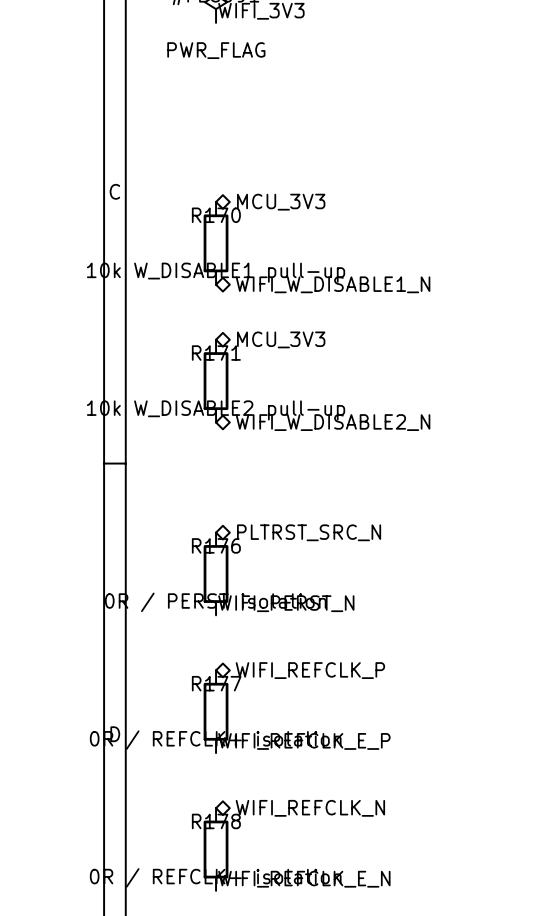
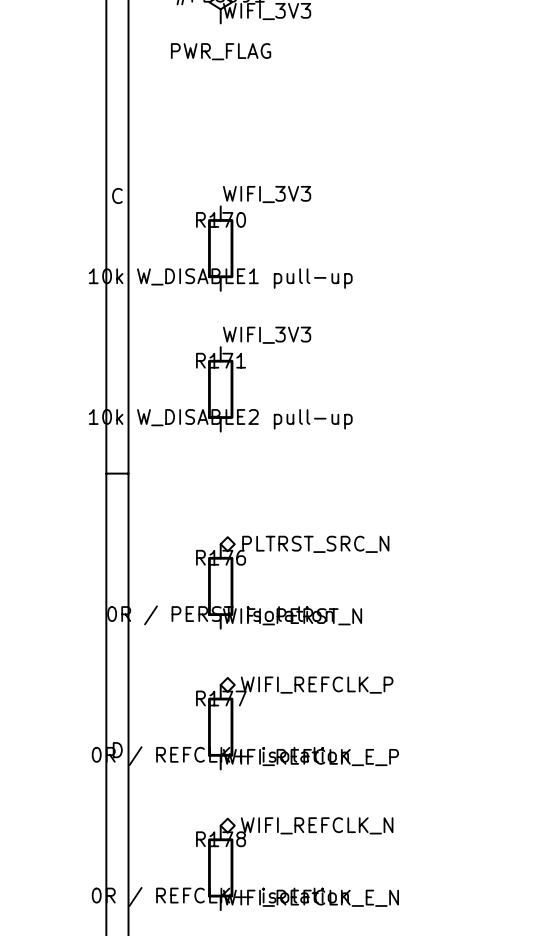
label: none -> WIFI_3V3 (267, 194)
hierarchical label: MCU_3V3 (281, 202) -> none
hierarchical label: WIFI_W_DISABLE1_N (333, 284) -> none
label: none -> WIFI_3V3 (267, 335)
hierarchical label: MCU_3V3 (281, 339) -> none
hierarchical label: WIFI_W_DISABLE2_N (333, 422) -> none

